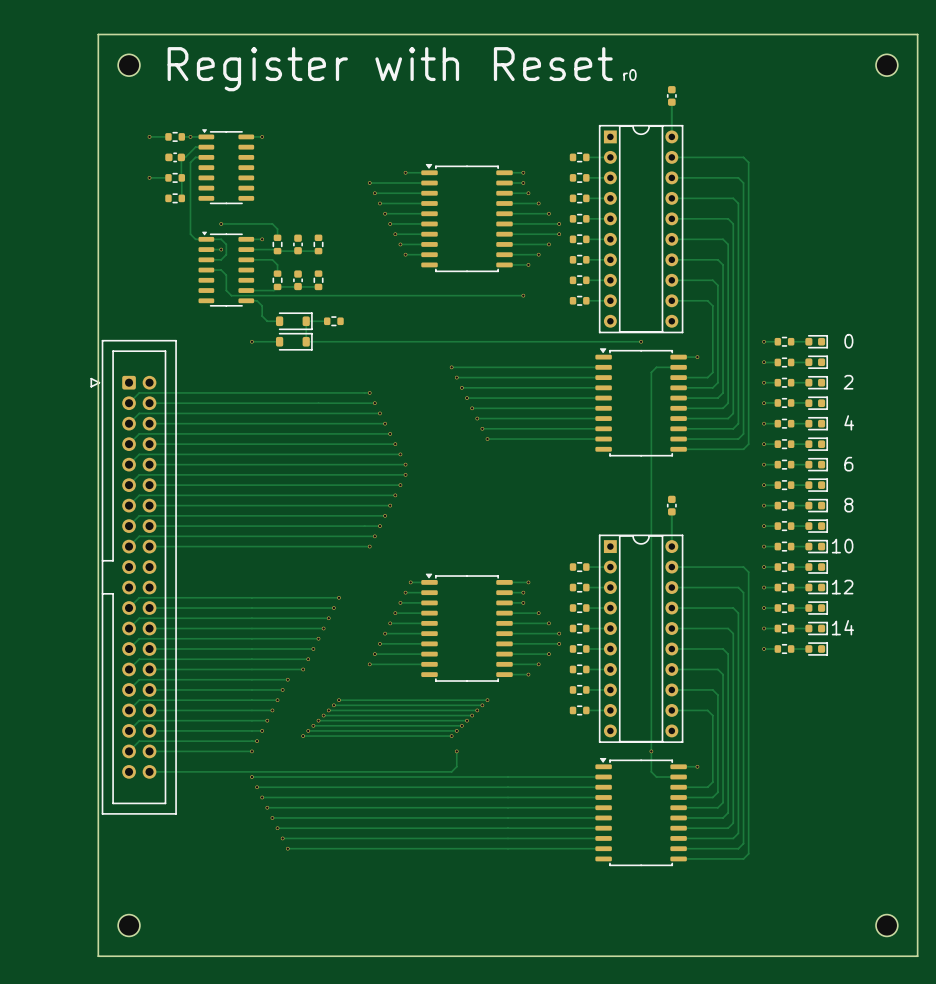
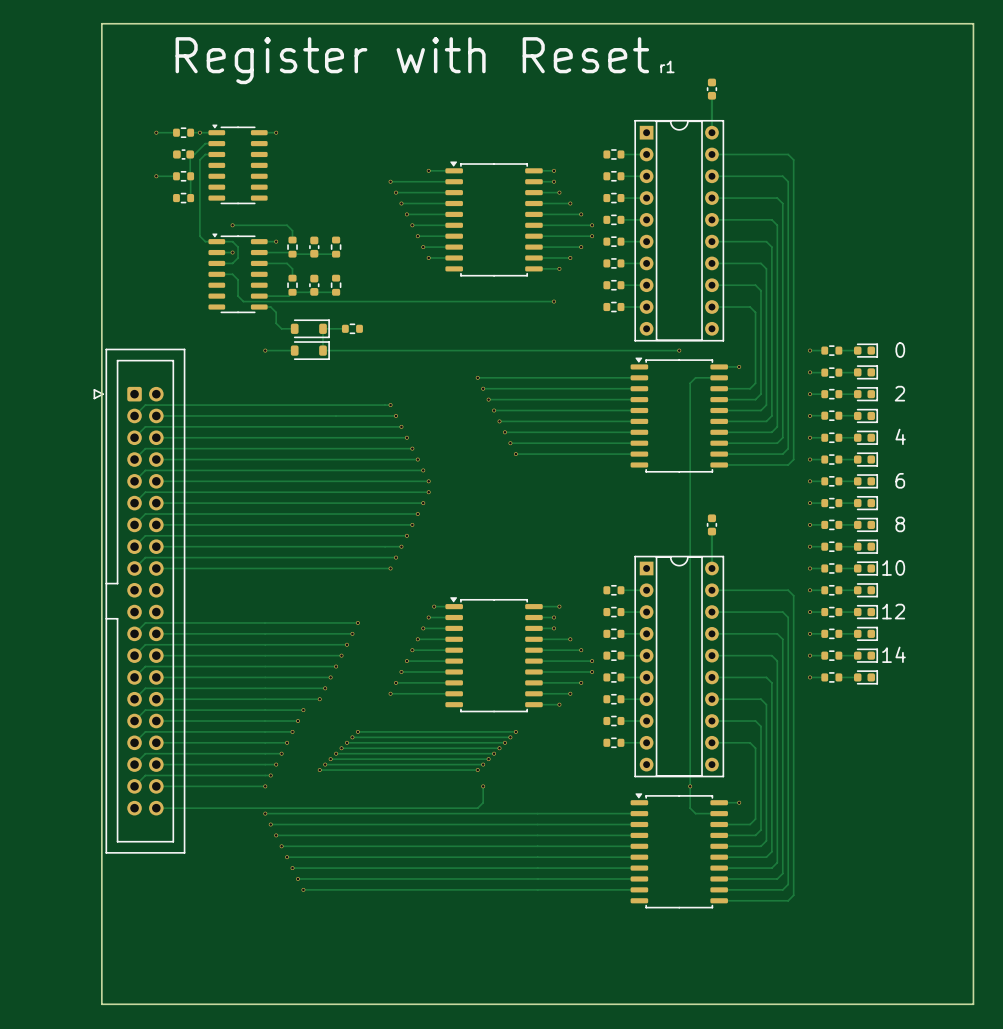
part: (129, 65) -> none
part: (886, 65) -> none
text: r0 (630, 75) -> r1 (667, 66)
part: (129, 925) -> none
part: (886, 925) -> none

